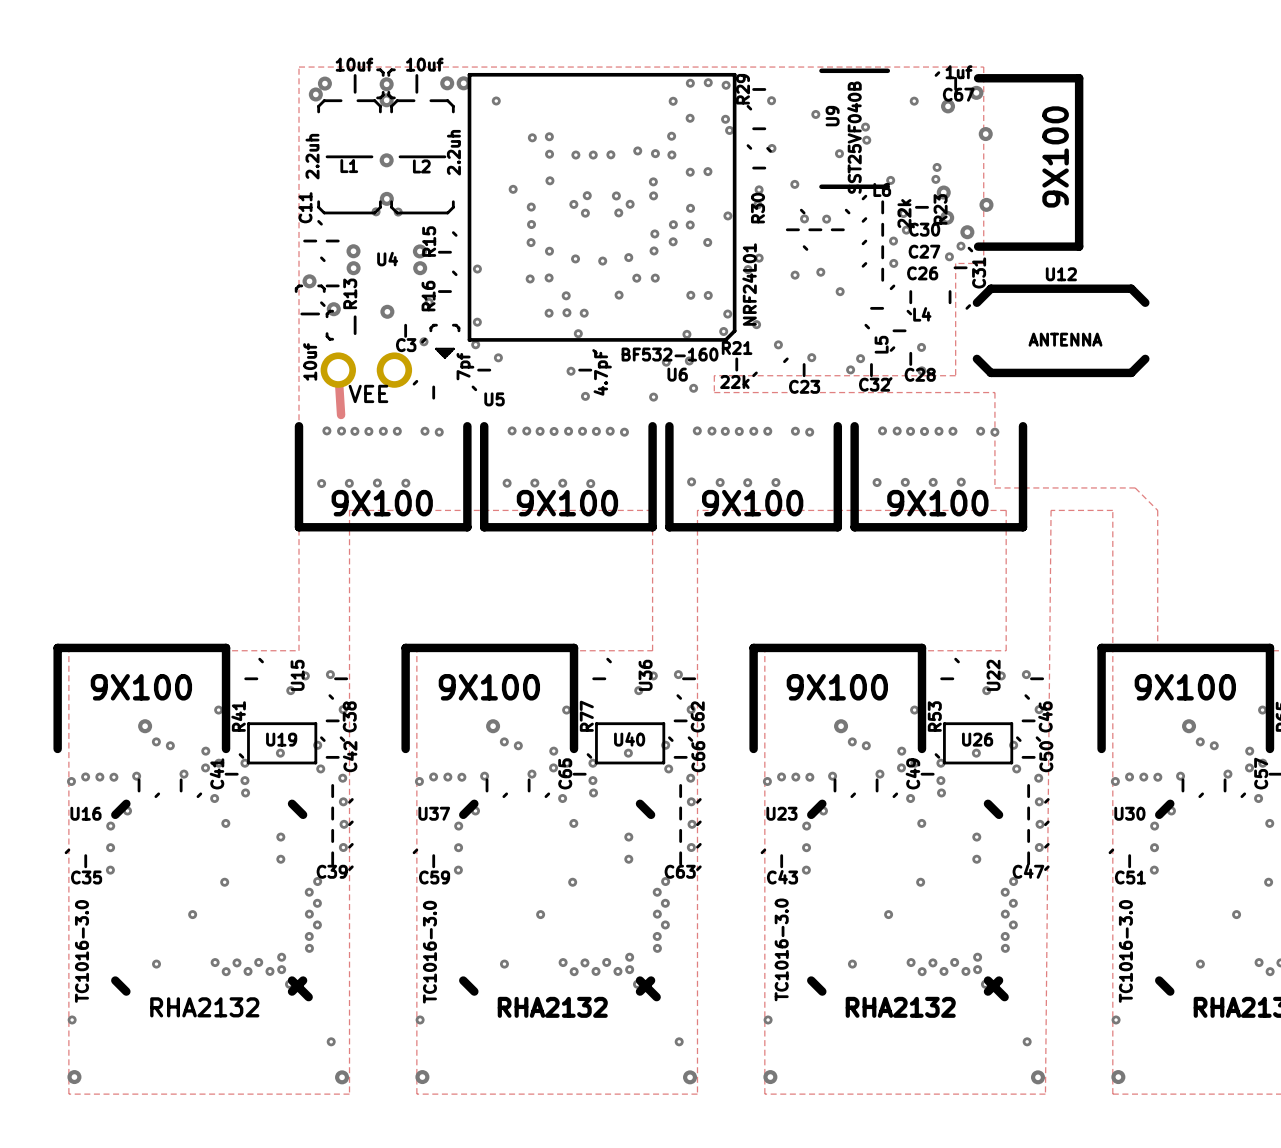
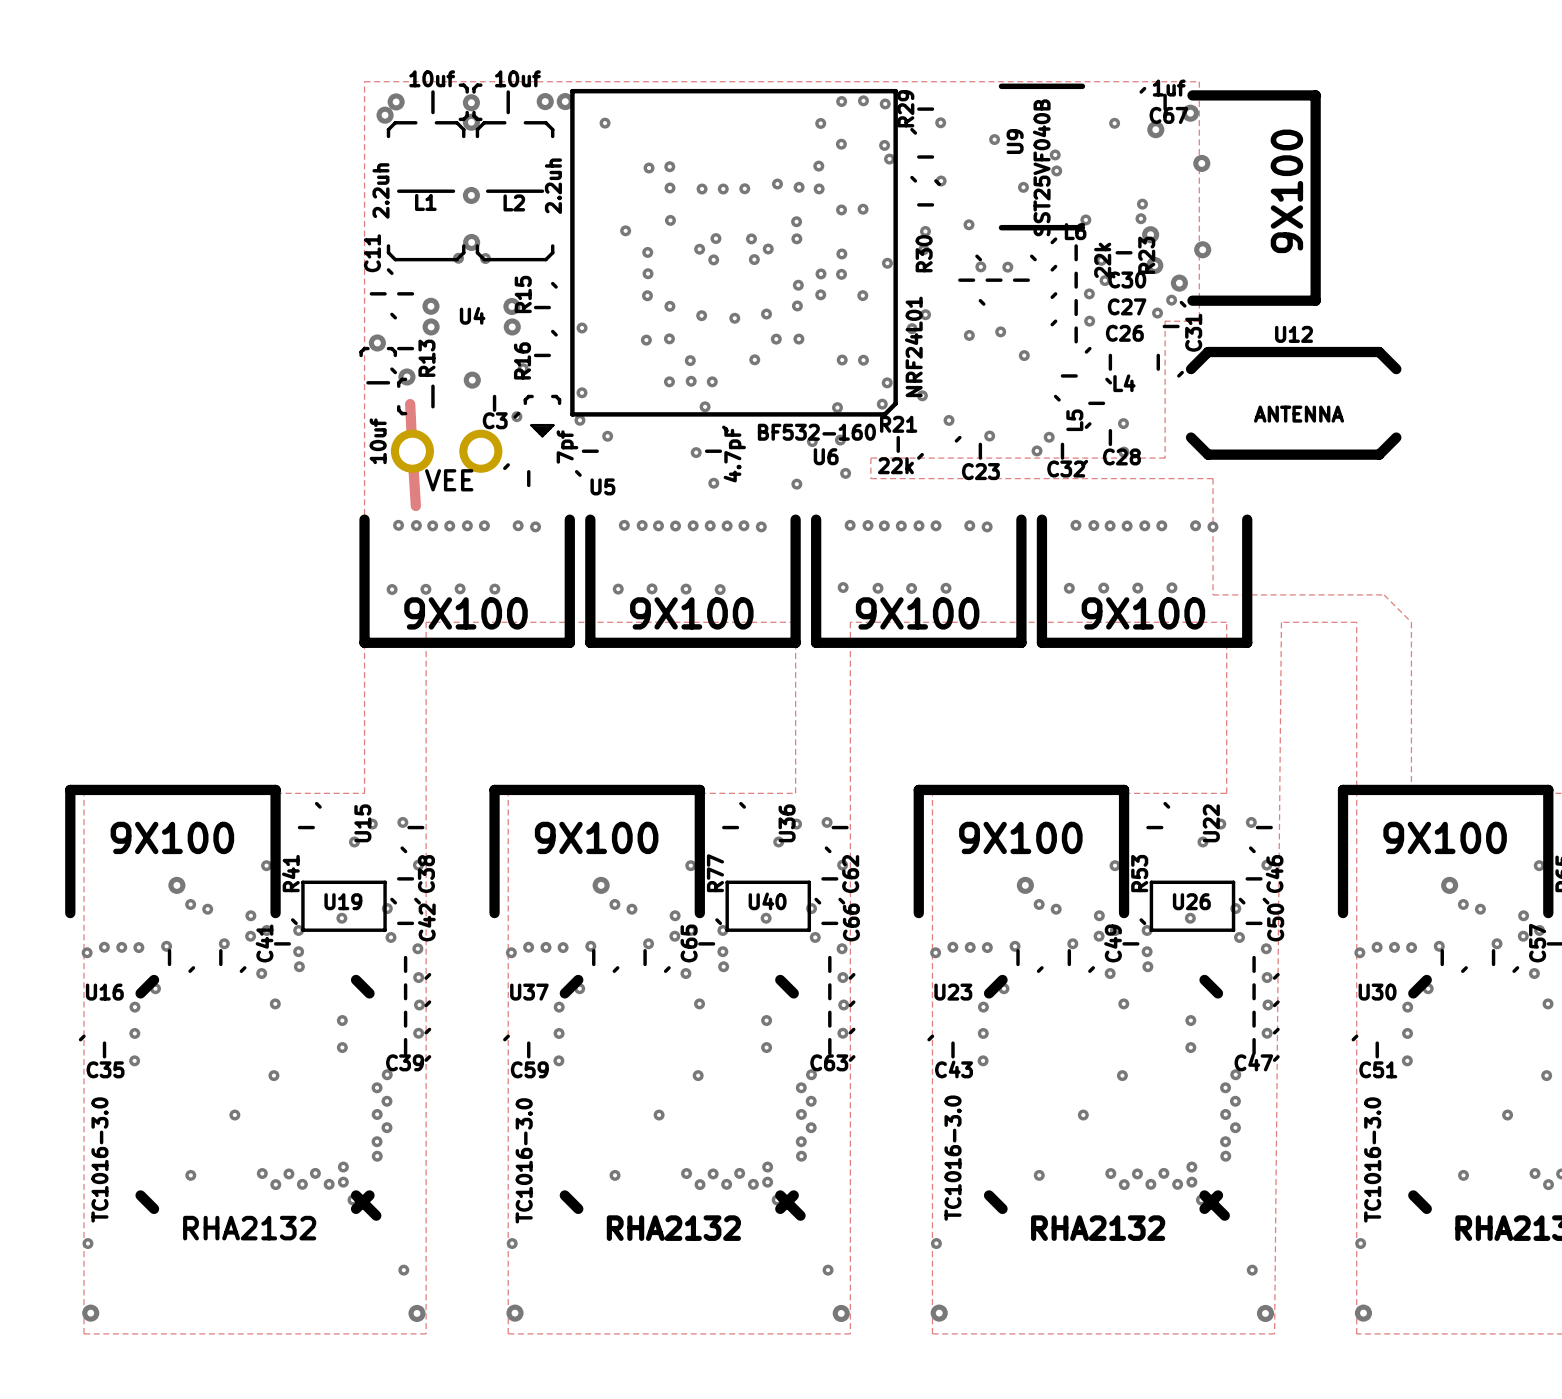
track: none -> (410, 404) (412, 451)

